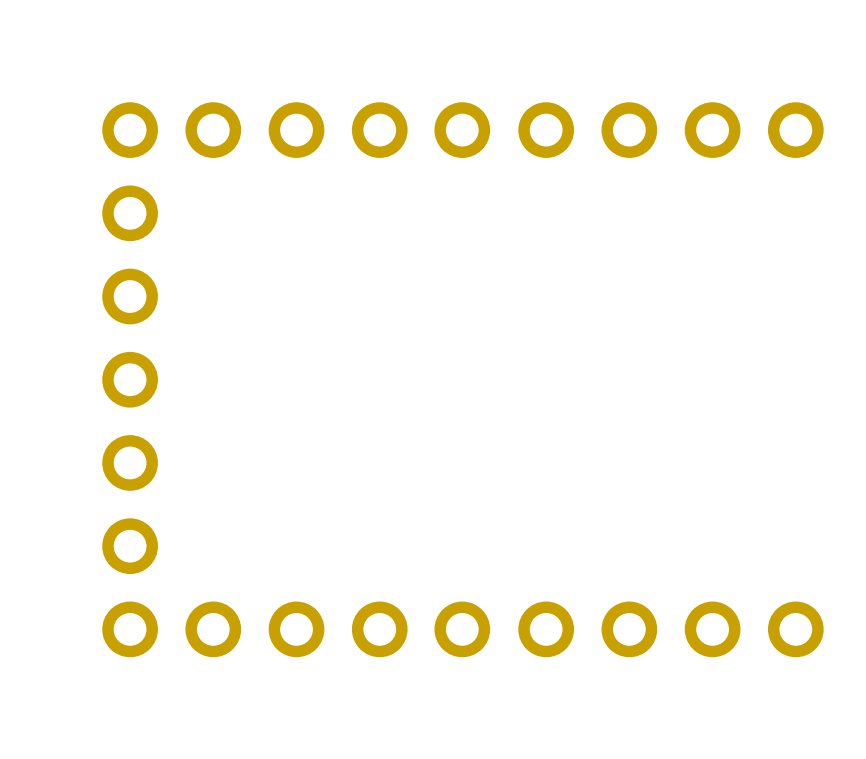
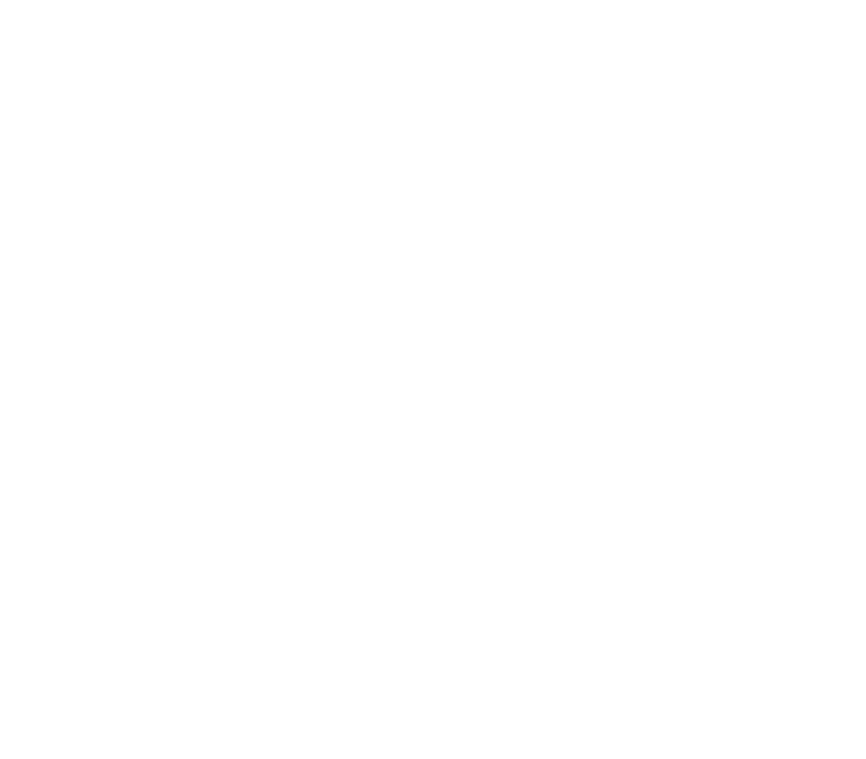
part: (462, 379) -> none

